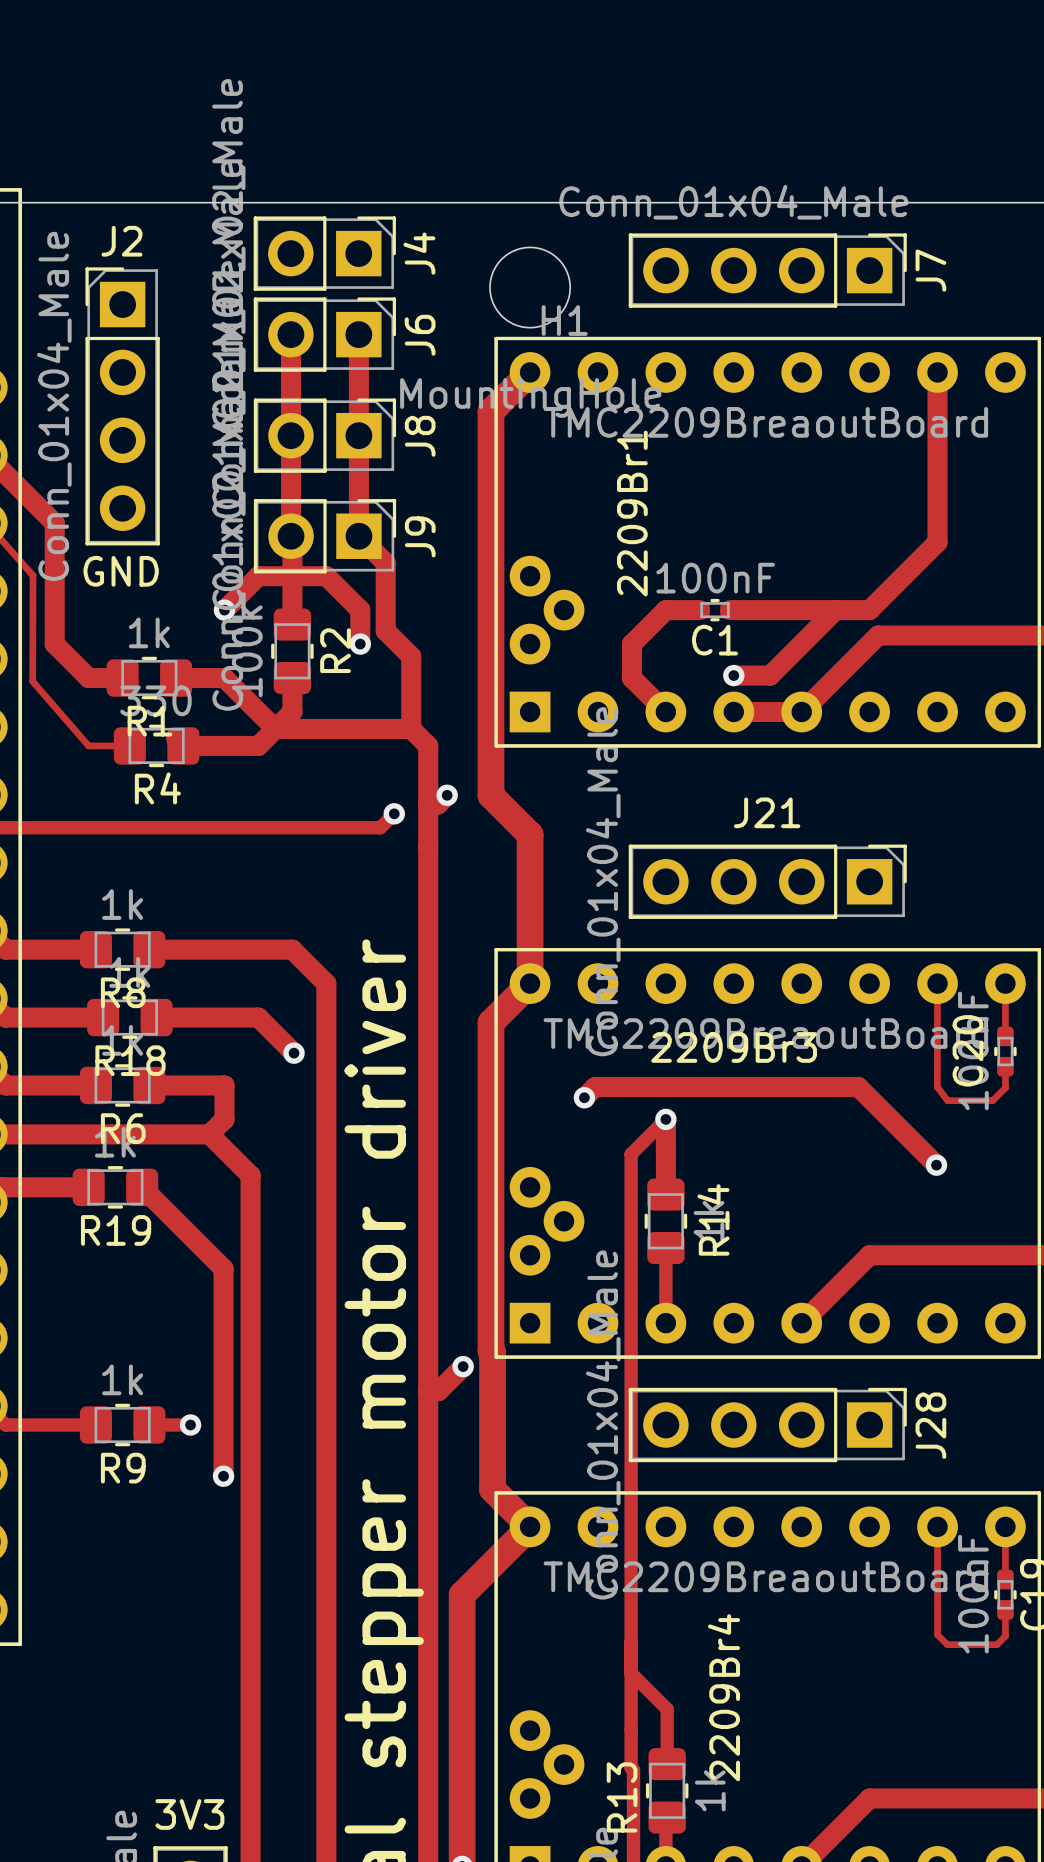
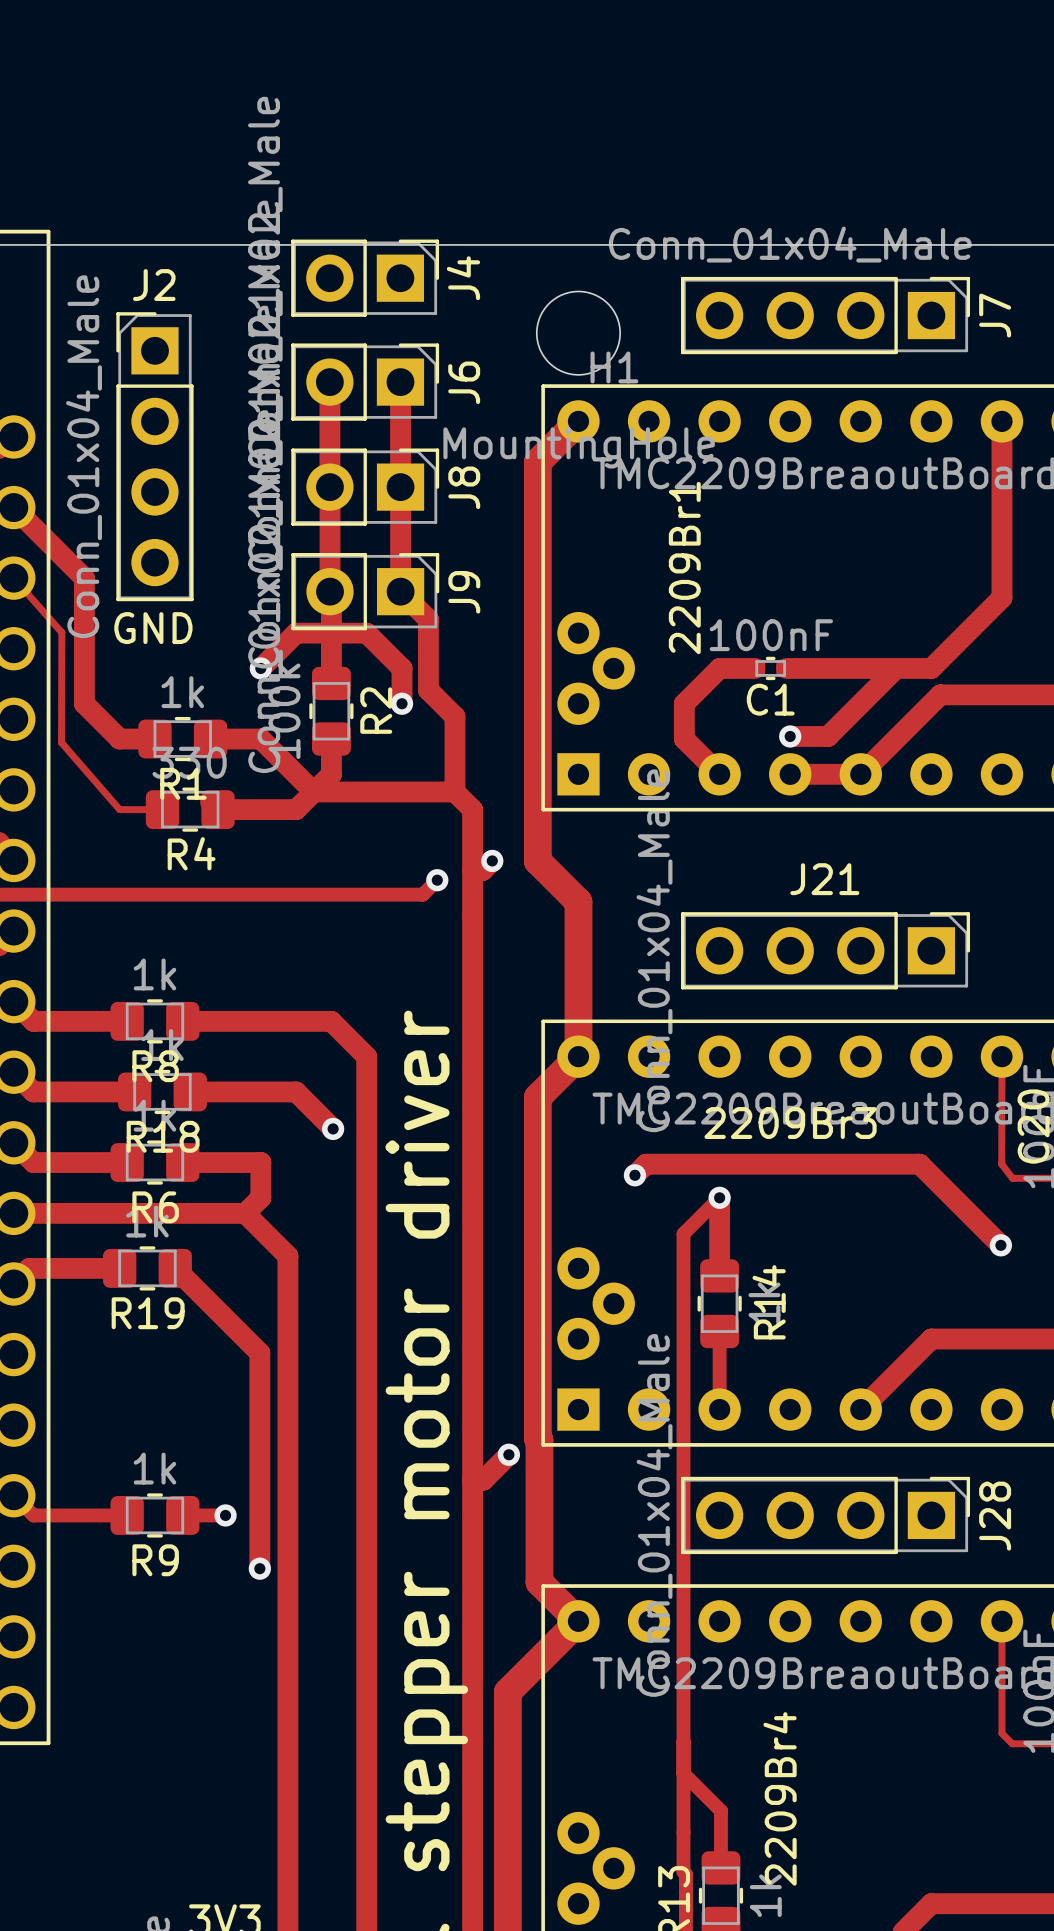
J4 position: (324, 253) -> (365, 278)

